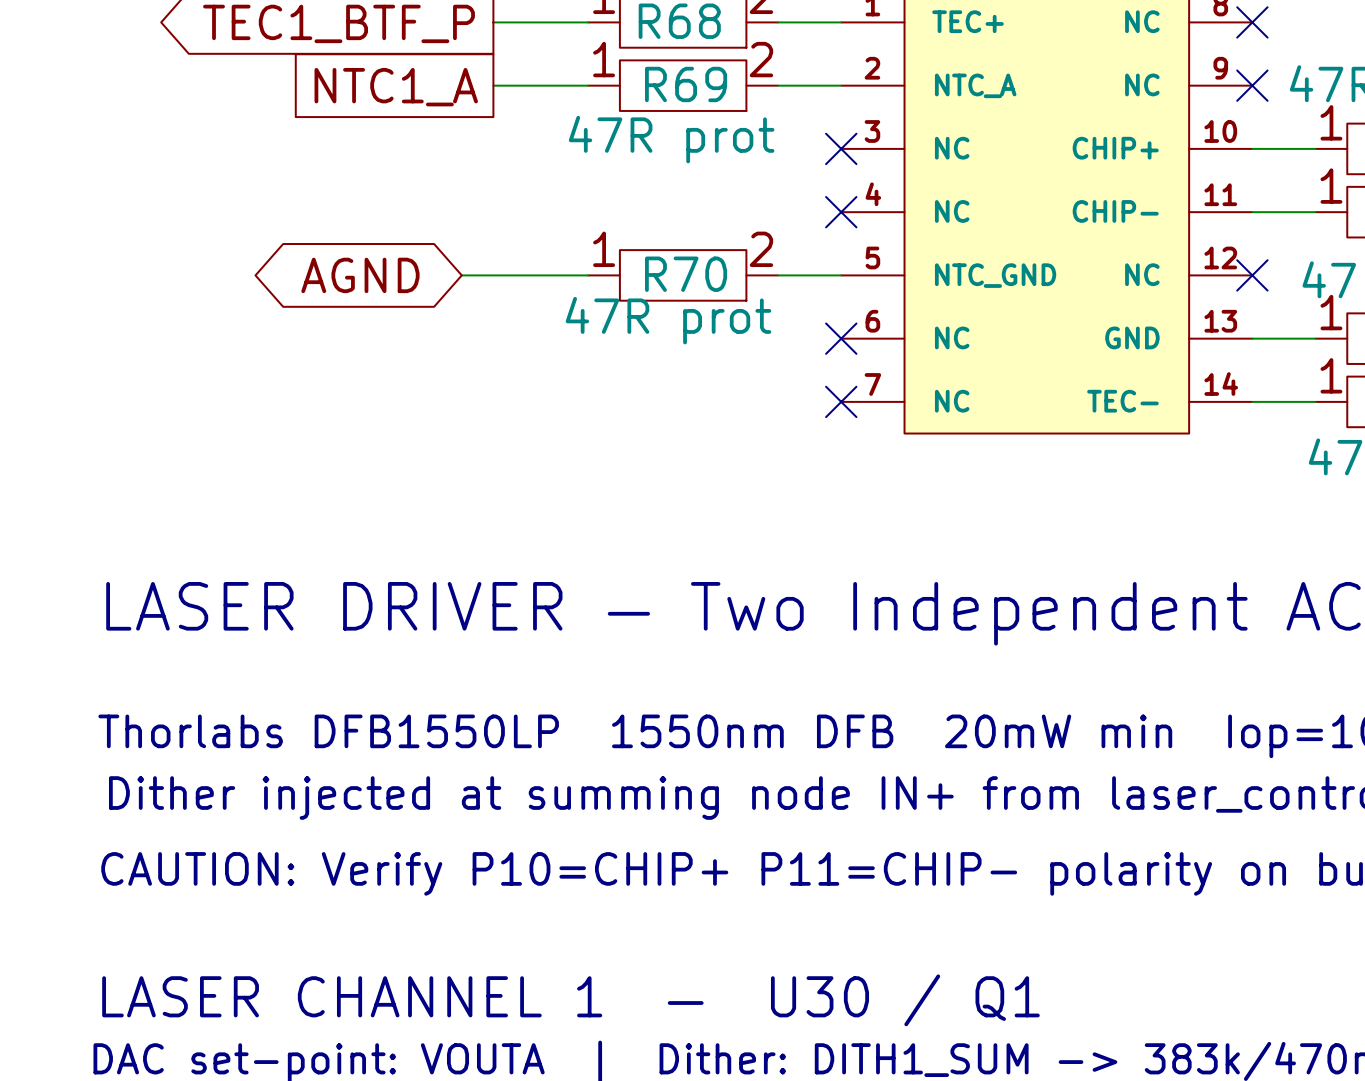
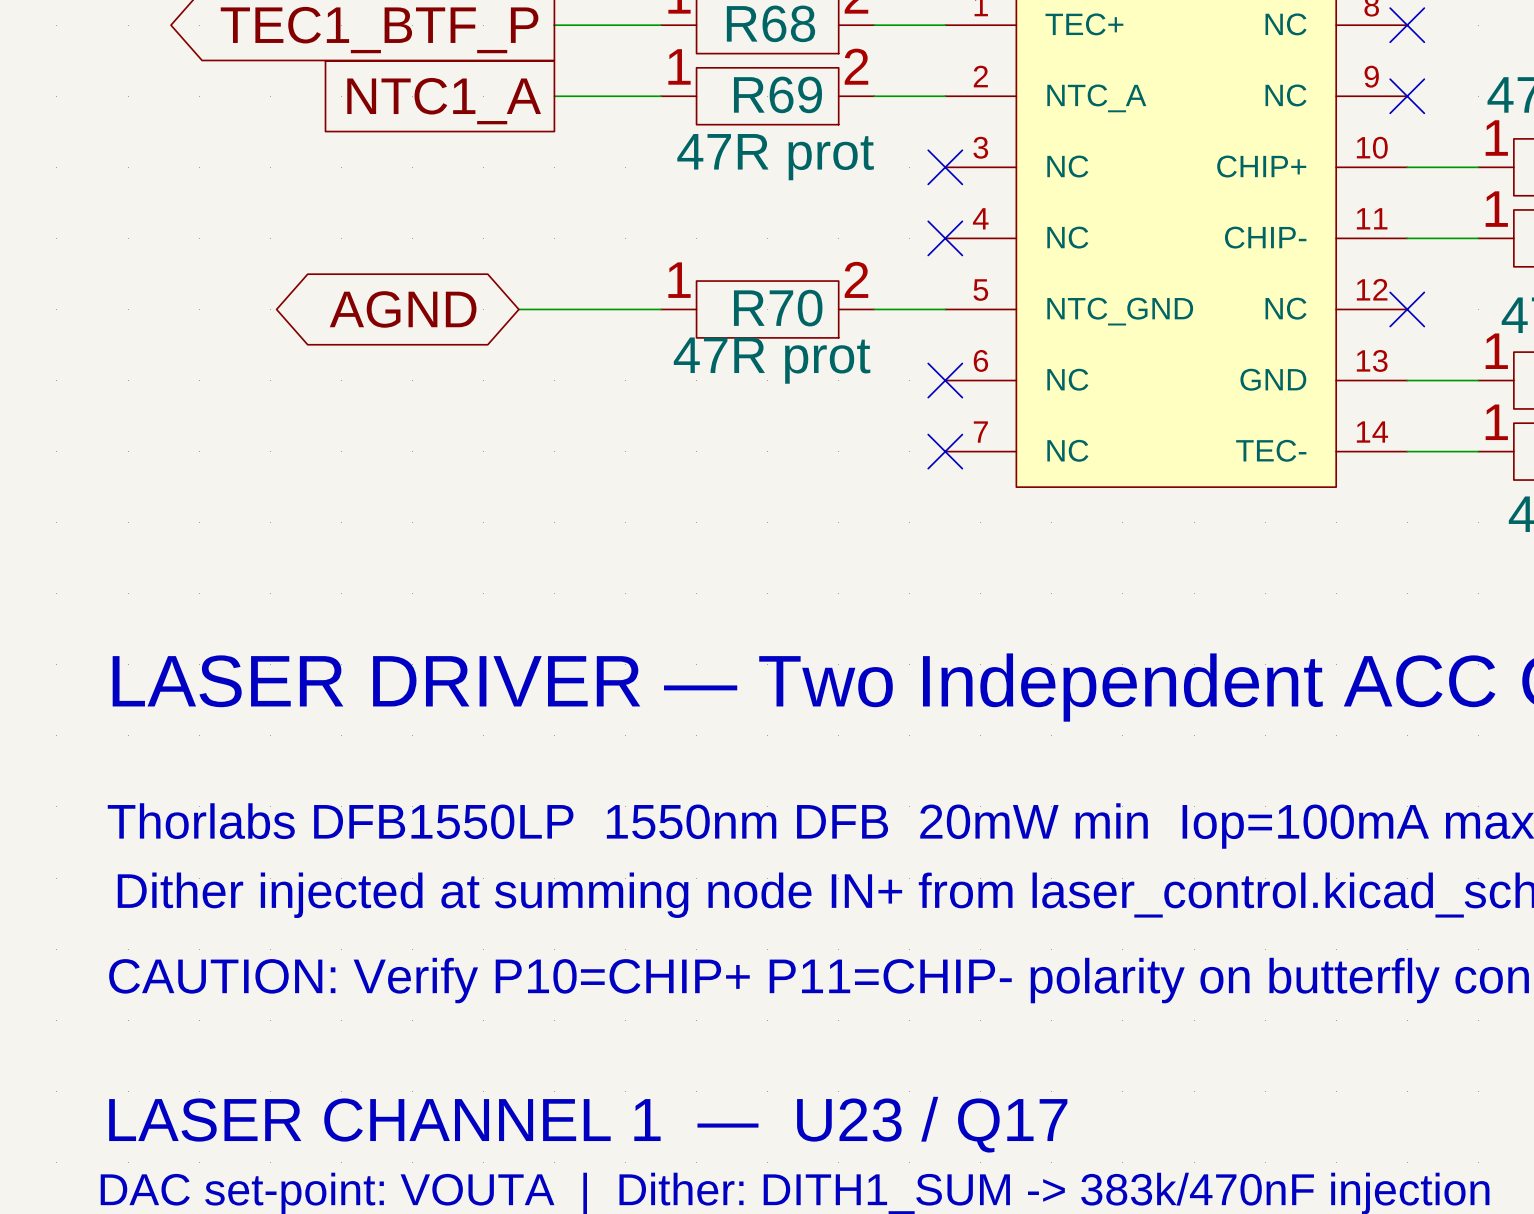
text: LASER CHANNEL 1 — U30 / Q1 (570, 1000) -> LASER CHANNEL 1 — U23 / Q17 (588, 1124)

